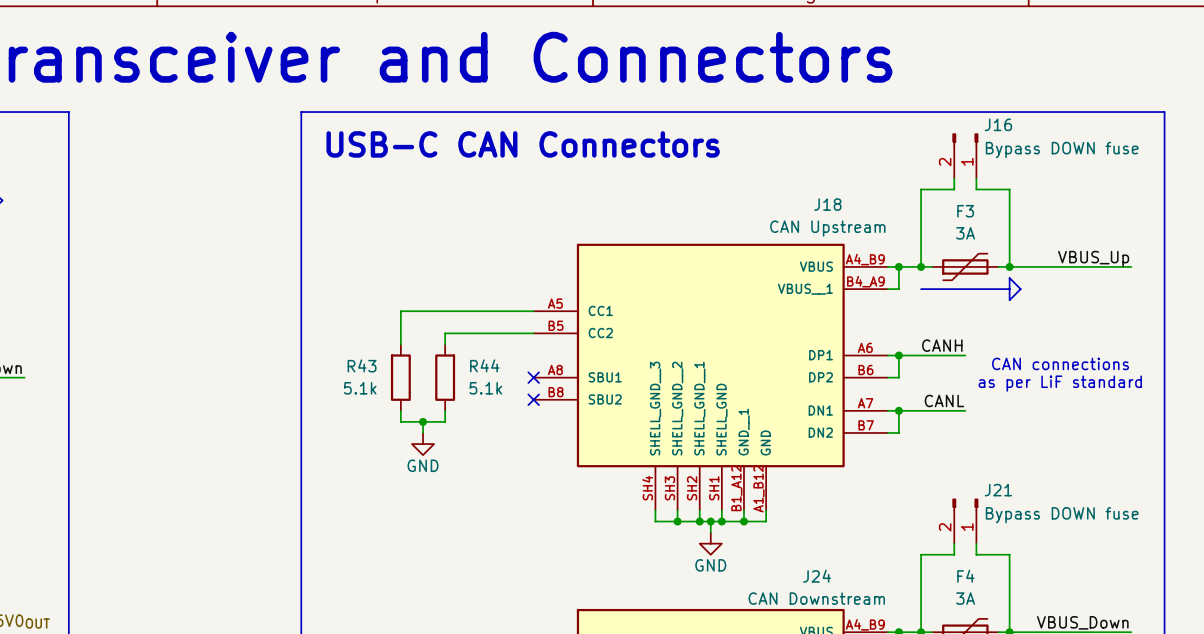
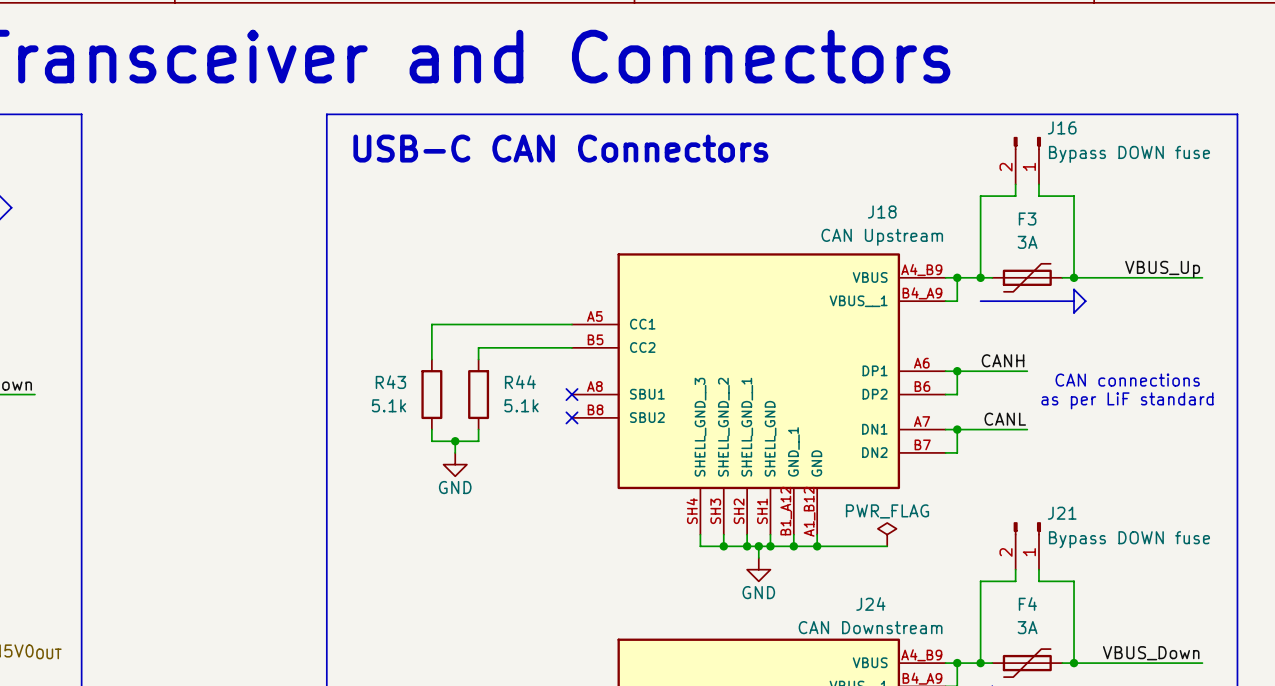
power symbol: none -> PWR_FLAG (887, 534)
wire: none -> (817, 546) (887, 546)
junction: none -> (817, 546)

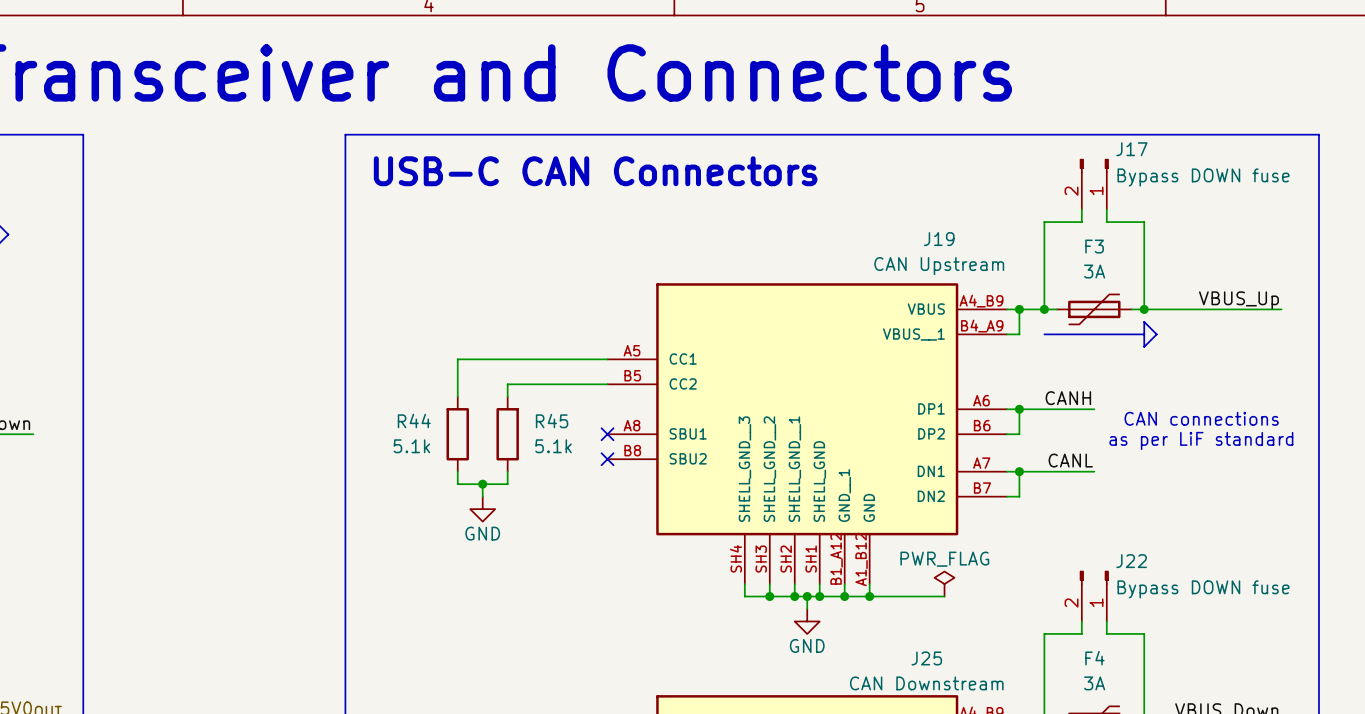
J16 name: J16 (1062, 127) -> J17 (1131, 149)
J18 name: J18 (882, 211) -> J19 (939, 239)
R43 name: R43 (390, 382) -> R44 (414, 421)
R44 name: R44 (520, 382) -> R45 (552, 421)
J21 name: J21 (1062, 513) -> J22 (1131, 561)
J24 name: J24 (870, 603) -> J25 (926, 658)

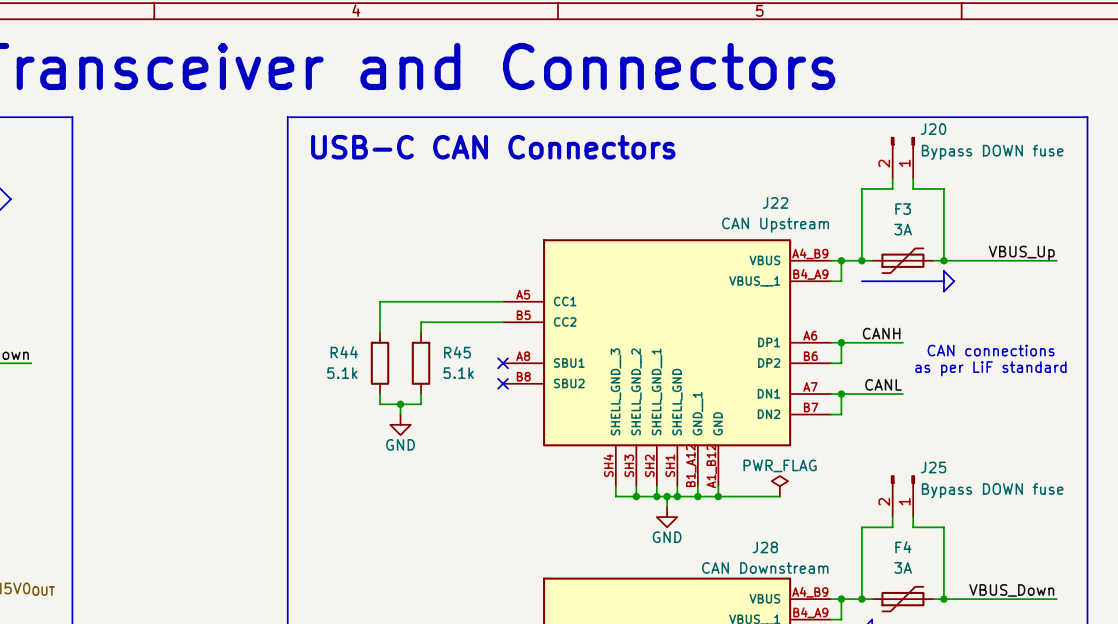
J17 name: J17 (1131, 149) -> J20 (933, 129)
J19 name: J19 (939, 239) -> J22 (775, 202)
J22 name: J22 (1131, 561) -> J25 (933, 467)
J25 name: J25 (926, 658) -> J28 (765, 547)

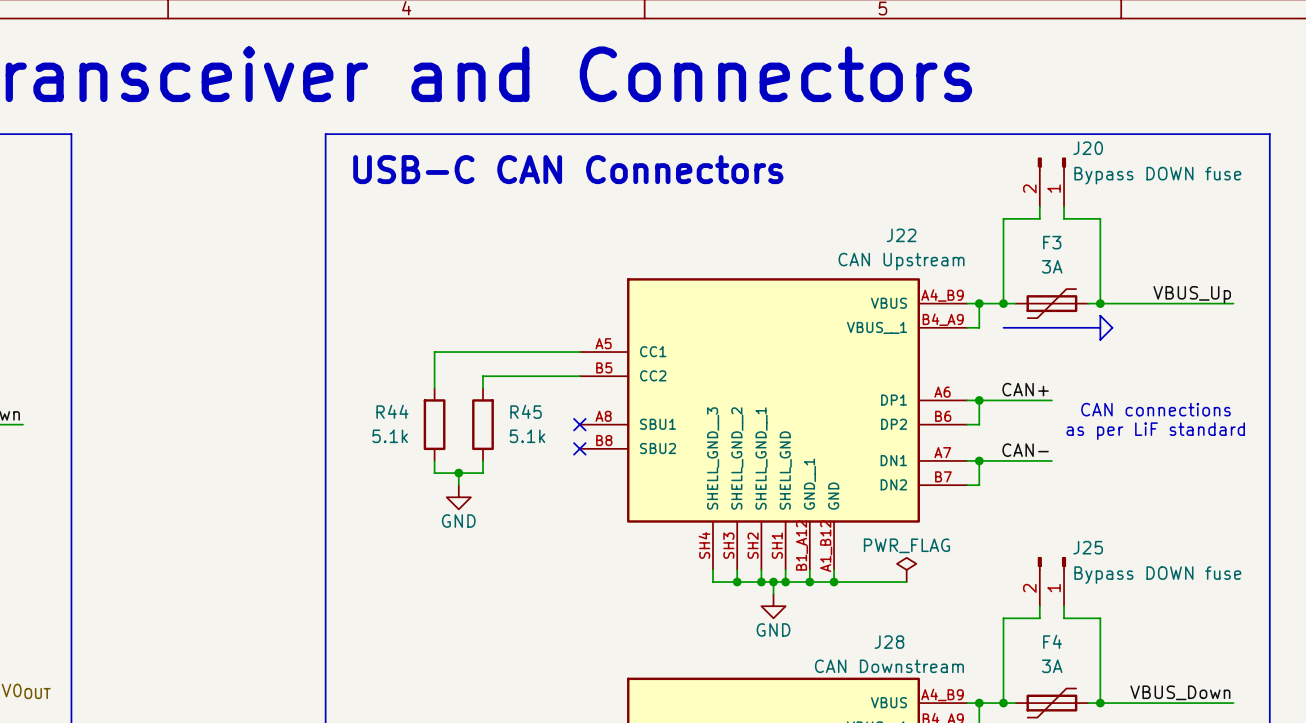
label: CANH (881, 333) -> CAN+ (1025, 389)
label: CANL (883, 384) -> CAN- (1025, 450)

